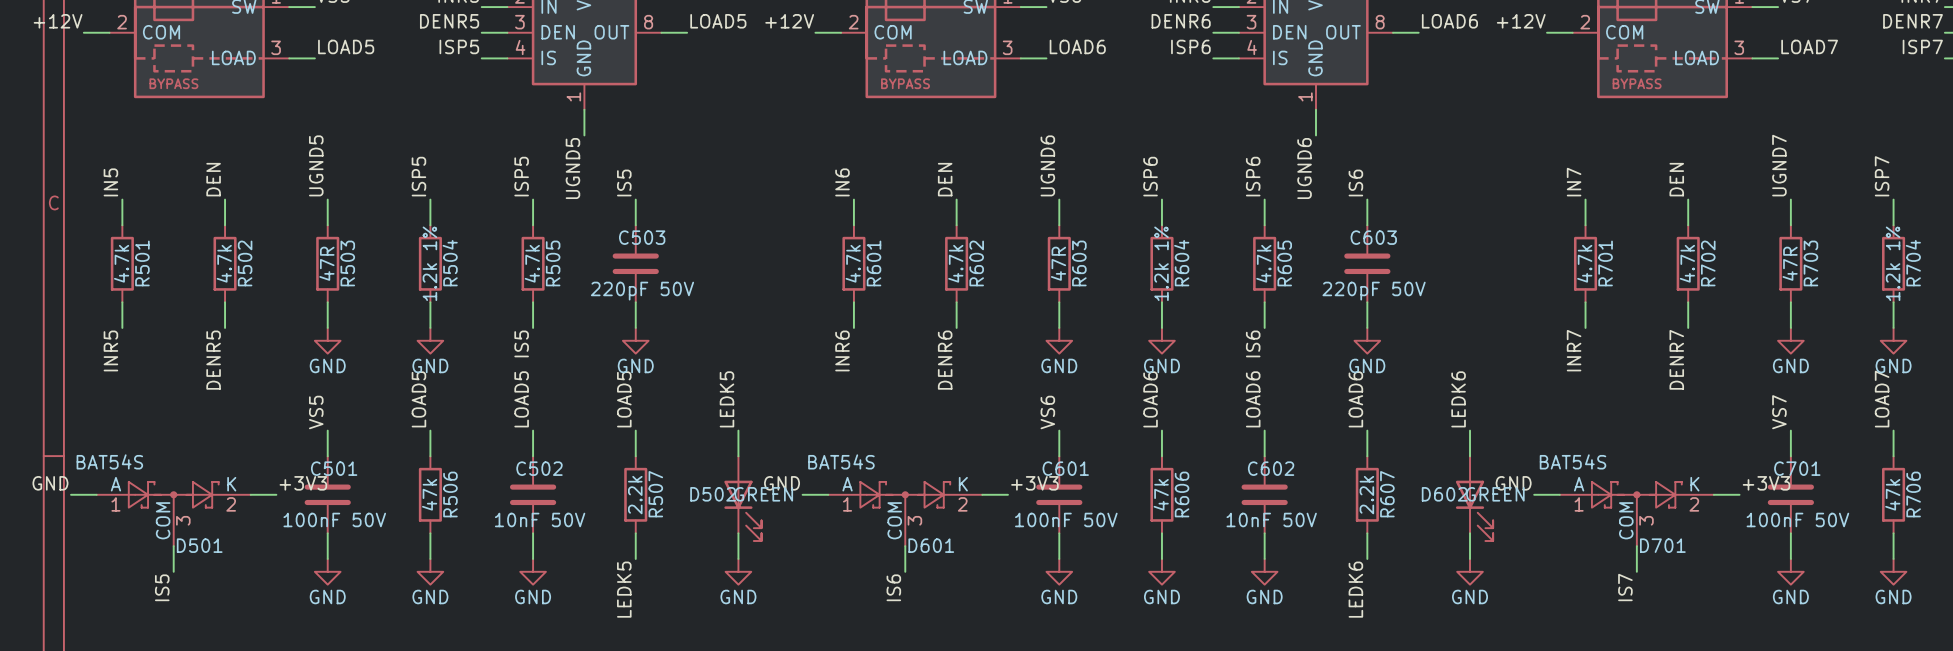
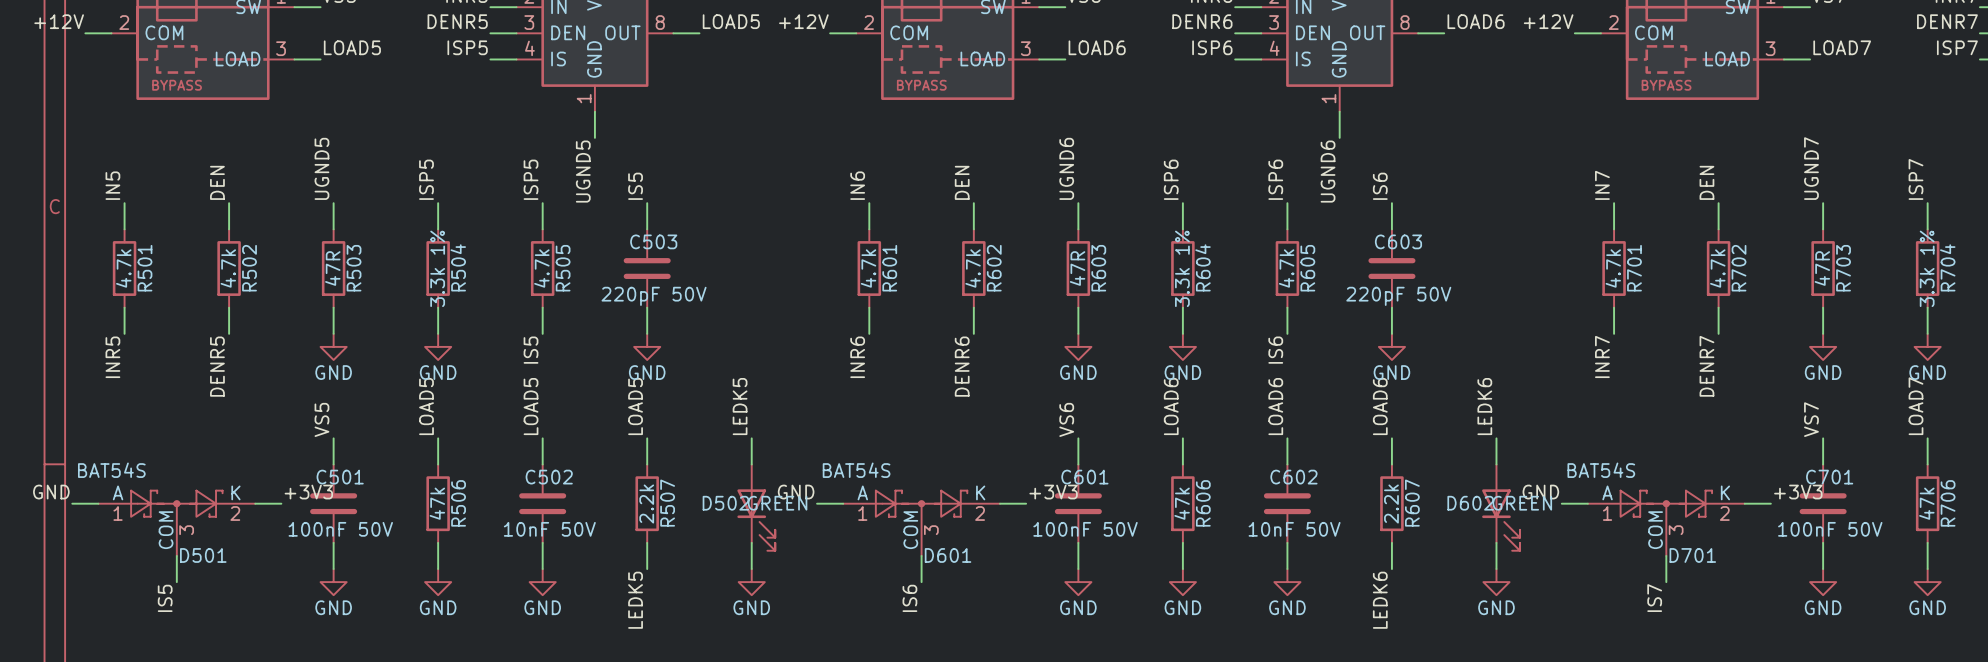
R504 value: 1.2k 1% (429, 263) -> 3.3k 1% (437, 268)
R604 value: 1.2k 1% (1161, 263) -> 3.3k 1% (1182, 268)
R704 value: 1.2k 1% (1893, 263) -> 3.3k 1% (1927, 268)

